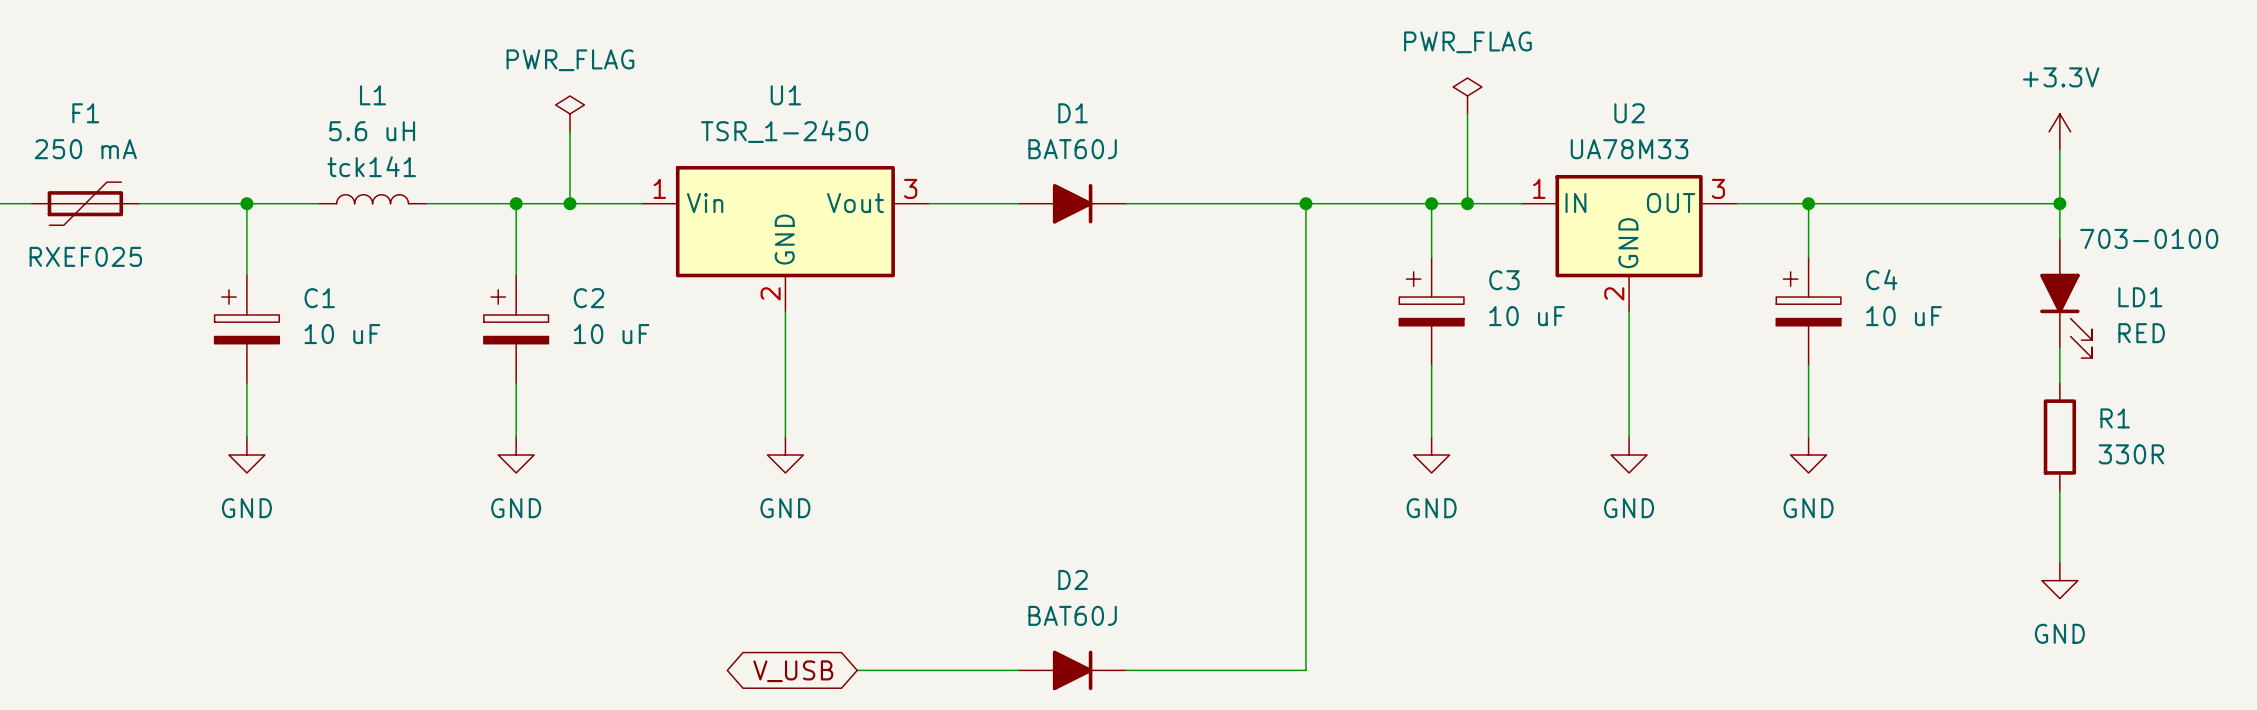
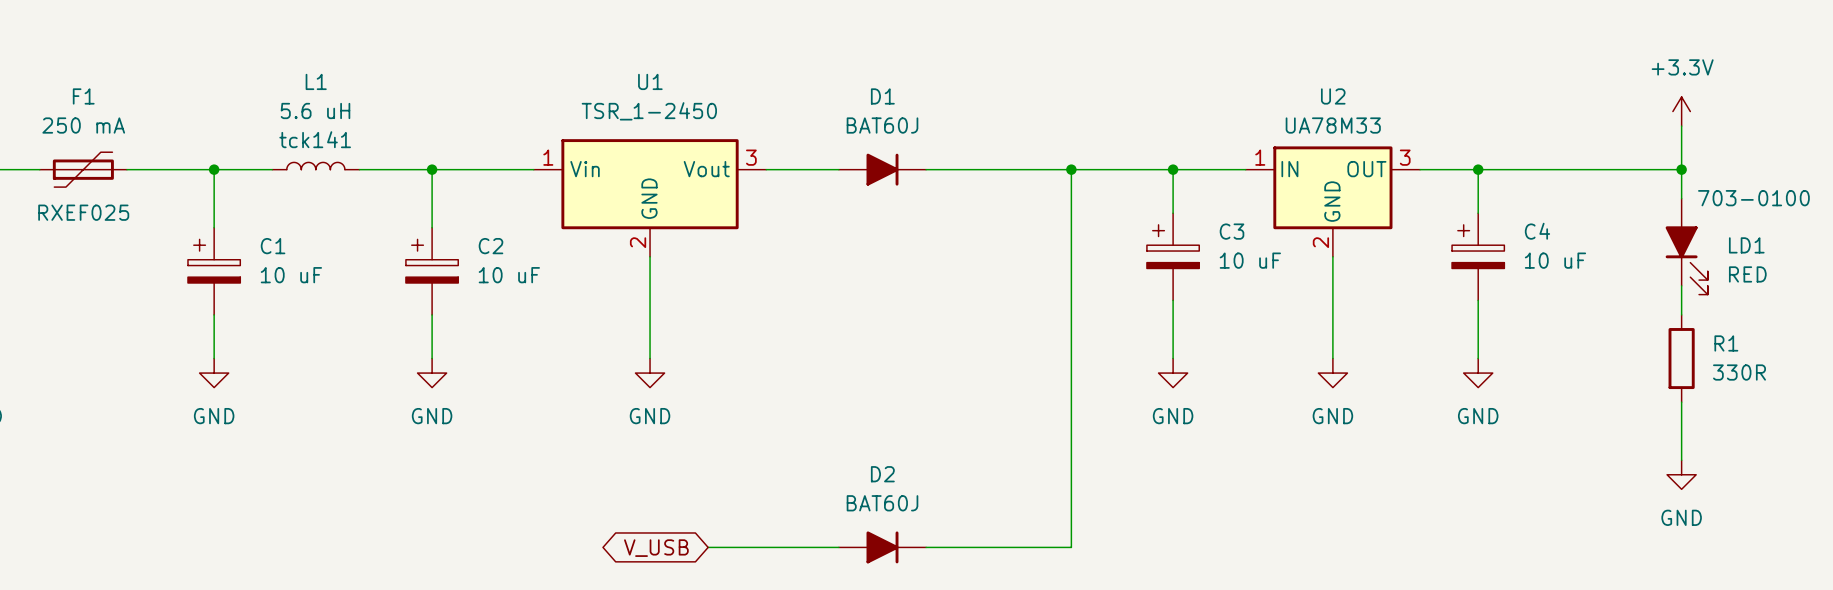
power symbol: PWR_FLAG (1467, 95) -> none
power symbol: PWR_FLAG (570, 113) -> none
wire: (1467, 113) (1467, 203) -> none
wire: (570, 131) (570, 203) -> none
junction: (570, 203) -> none
junction: (1467, 203) -> none

